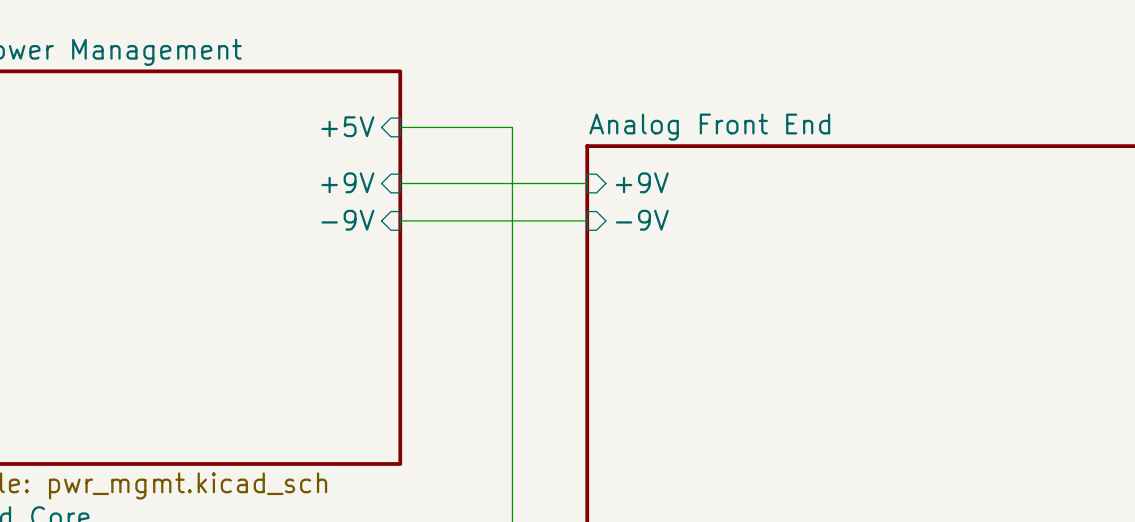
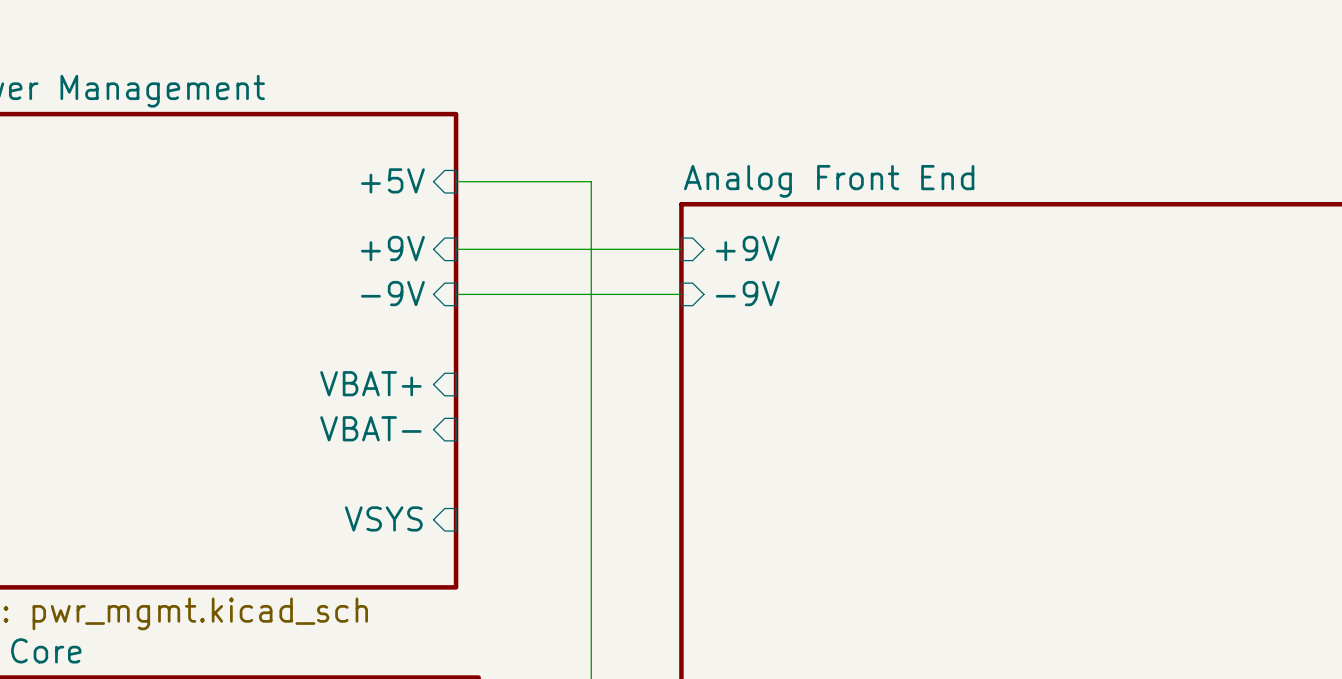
sheet pin: none -> VBAT+ (370, 383)
sheet pin: none -> VBAT- (370, 428)
sheet pin: none -> VSYS (383, 518)

